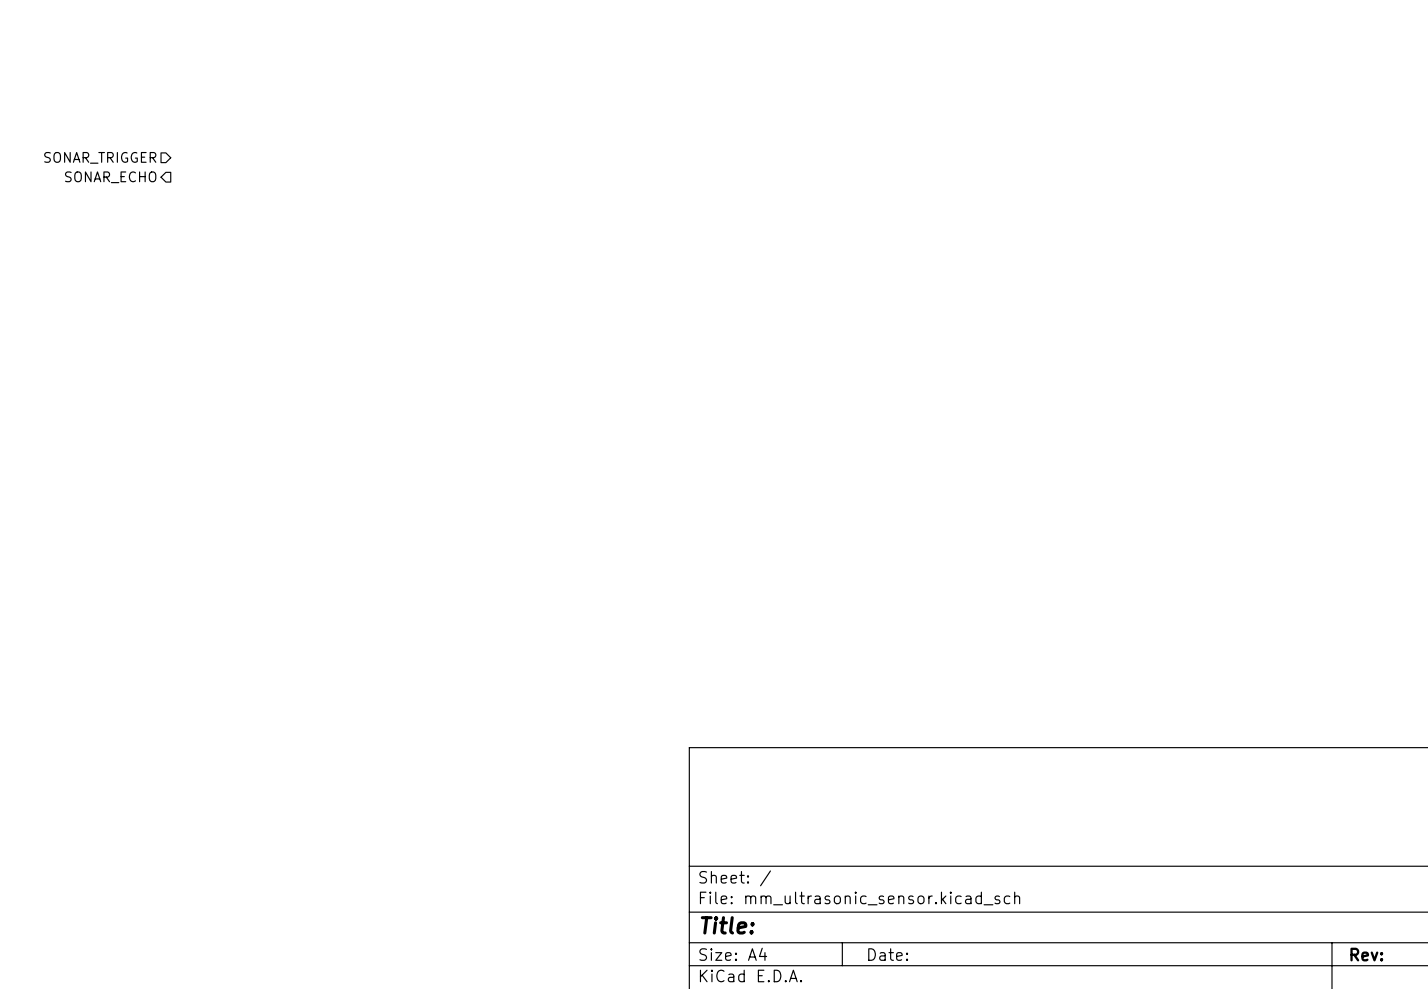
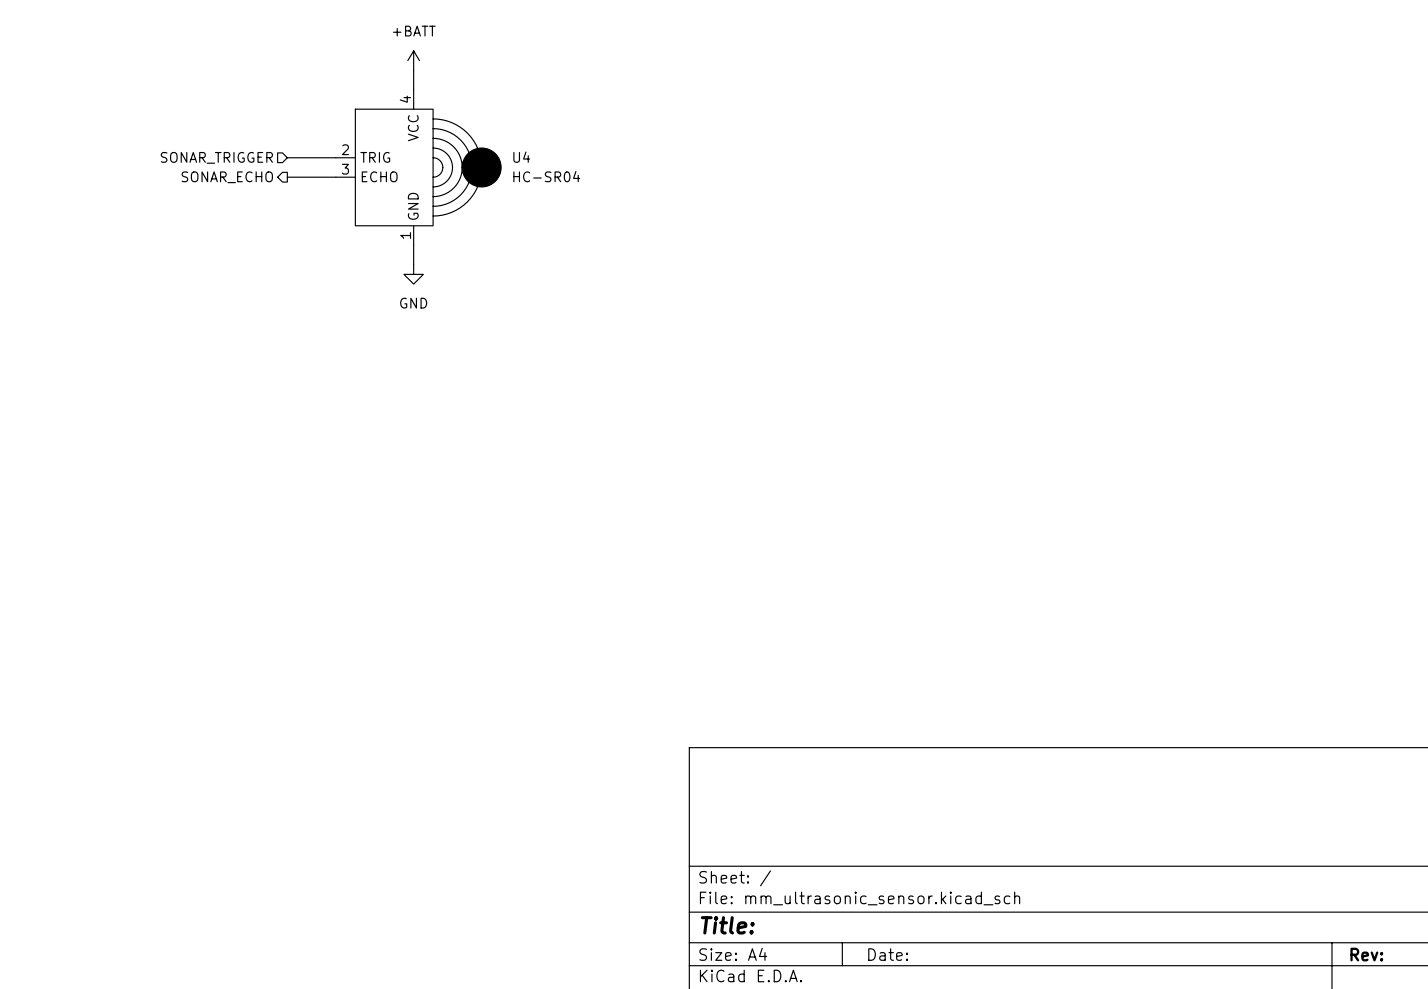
power symbol: none -> +BATT (413, 60)
wire: none -> (413, 70) (413, 89)
hierarchical label position: SONAR_TRIGGER (100, 157) -> SONAR_TRIGGER (216, 157)
wire: none -> (287, 157) (335, 157)
U4: none -> HC-SR04 (418, 167)
hierarchical label position: SONAR_ECHO (110, 177) -> SONAR_ECHO (227, 177)
wire: none -> (287, 177) (335, 177)
wire: none -> (413, 245) (413, 264)
power symbol: none -> GND (413, 274)

